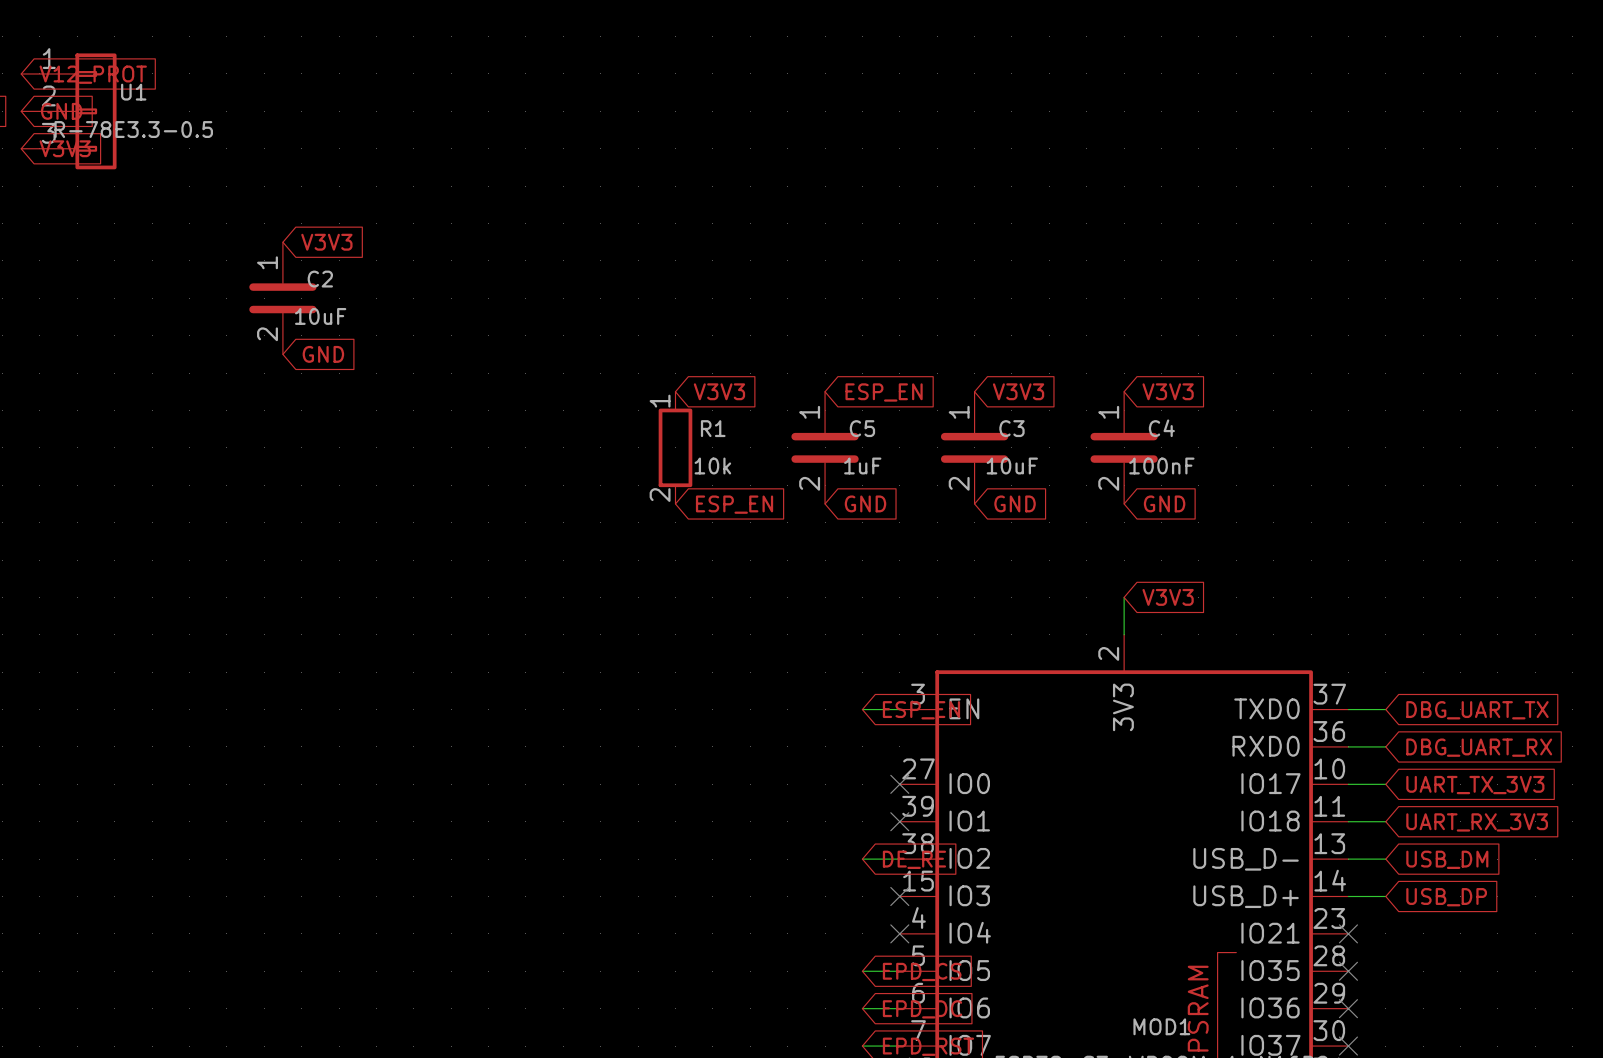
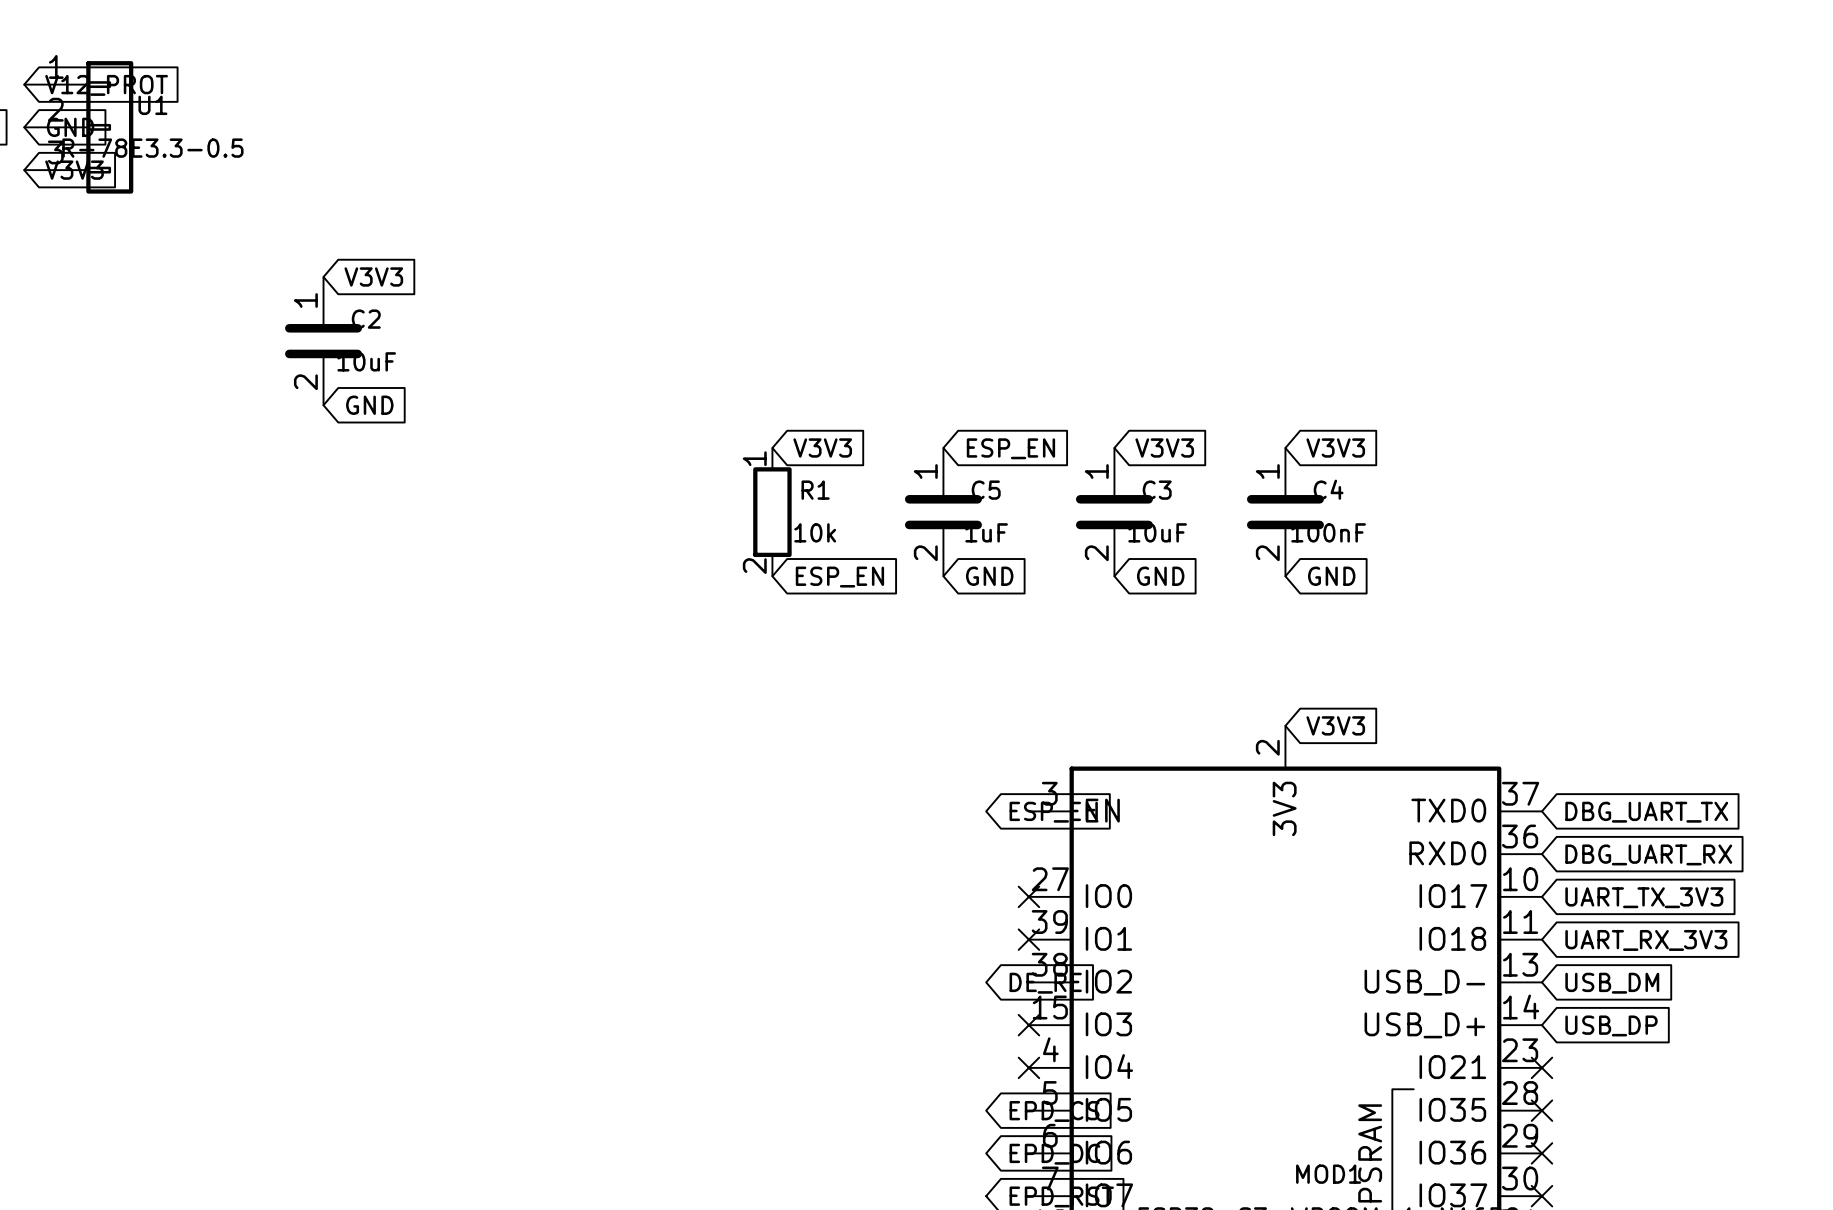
wire: (1124, 597) (1124, 634) -> none
global label position: V3V3 (1168, 597) -> V3V3 (1335, 725)
wire: (862, 709) (899, 709) -> none
wire: (1348, 709) (1385, 709) -> none
global label position: DBG_UART_TX (1477, 710) -> DBG_UART_TX (1646, 812)
wire: (1348, 746) (1385, 746) -> none
global label position: DBG_UART_RX (1479, 747) -> DBG_UART_RX (1648, 854)
wire: (1348, 784) (1385, 784) -> none
global label position: UART_TX_3V3 (1475, 785) -> UART_TX_3V3 (1644, 897)
wire: (1348, 821) (1385, 821) -> none
global label position: UART_RX_3V3 (1477, 822) -> UART_RX_3V3 (1646, 940)
wire: (862, 859) (899, 859) -> none
wire: (1348, 859) (1385, 859) -> none
global label position: USB_DM (1447, 859) -> USB_DM (1612, 983)
wire: (1348, 896) (1385, 896) -> none
global label position: USB_DP (1446, 897) -> USB_DP (1611, 1025)
wire: (862, 971) (899, 971) -> none
wire: (862, 1008) (899, 1008) -> none
wire: (862, 1046) (899, 1046) -> none

